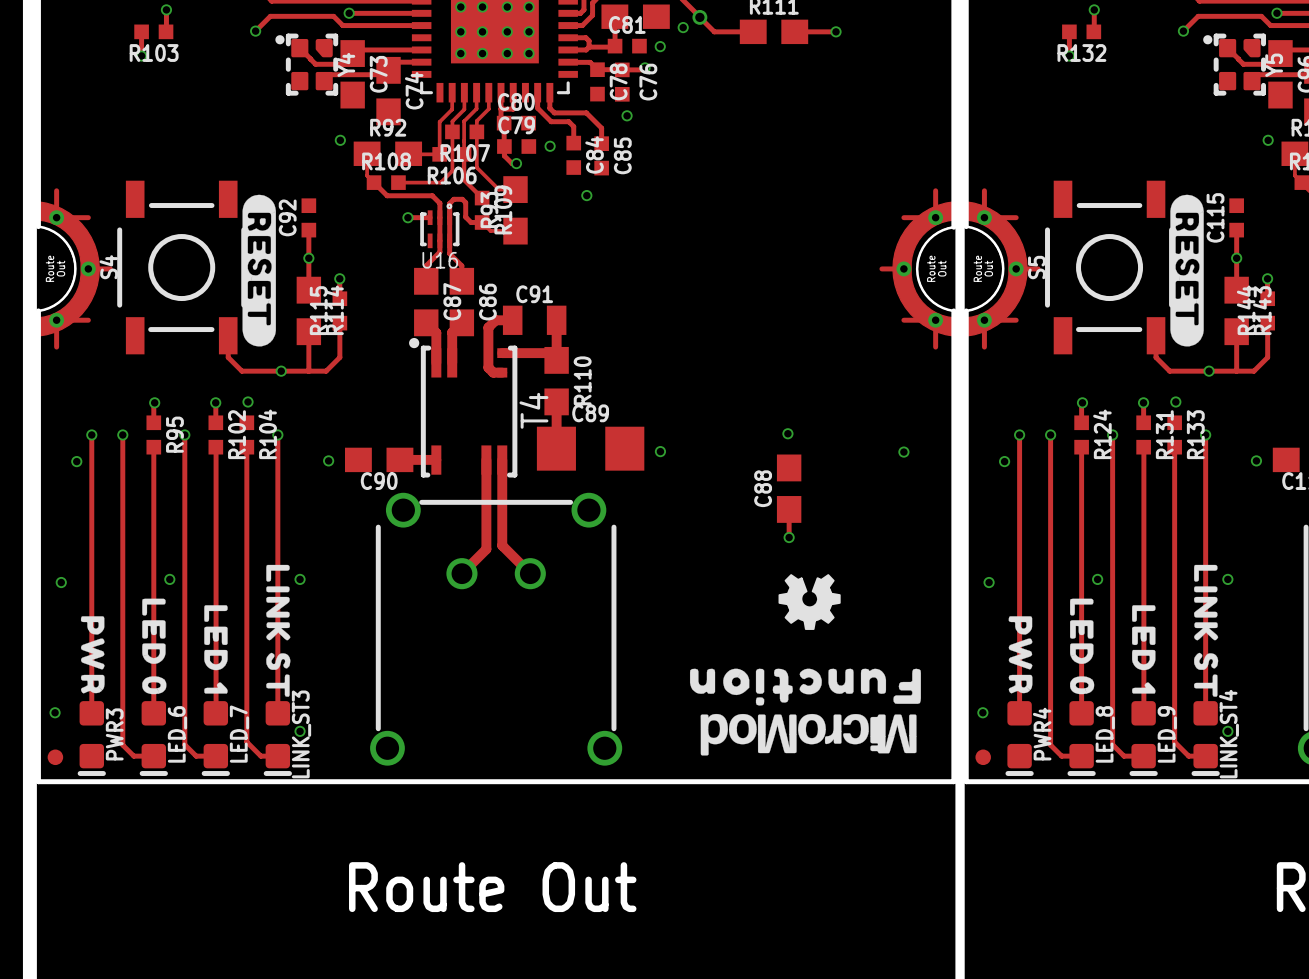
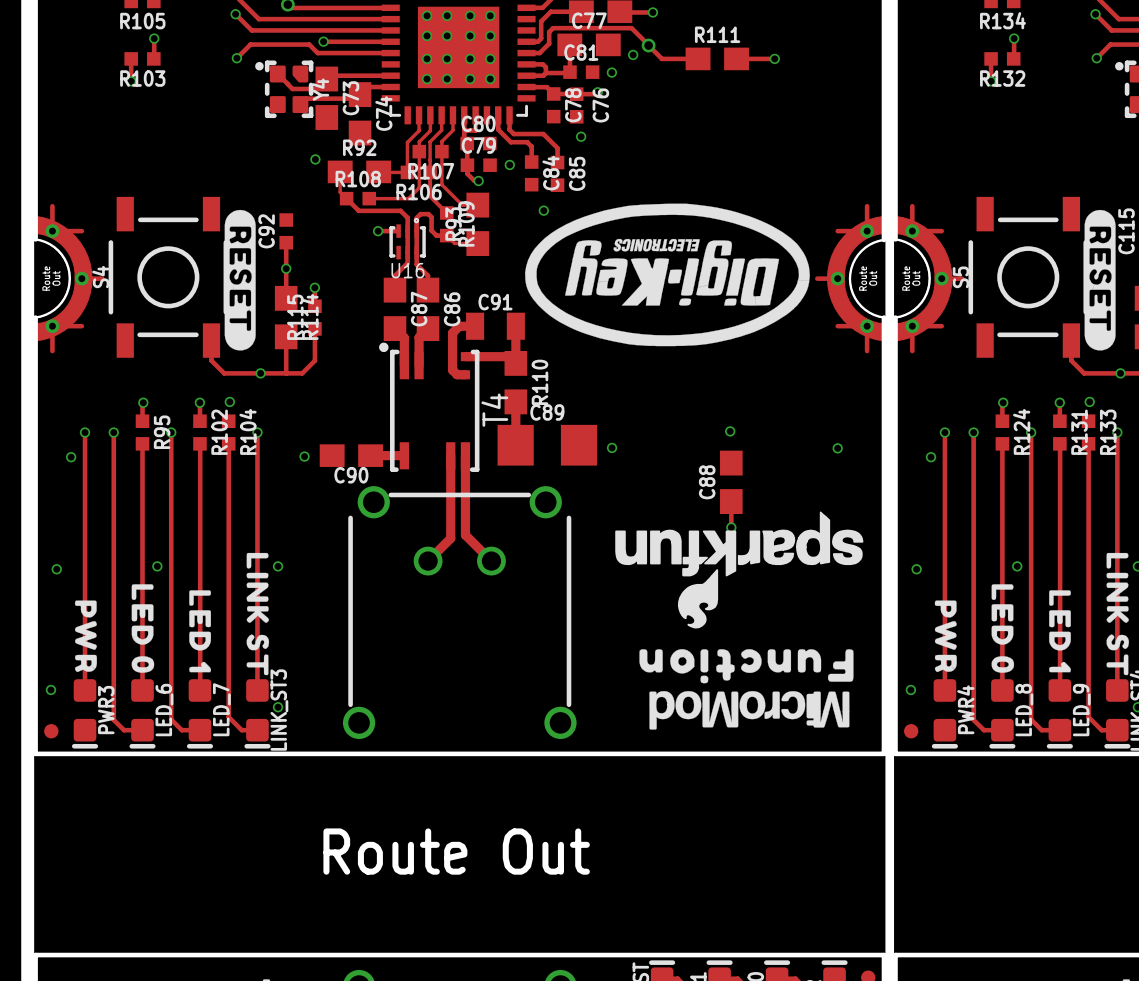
drawing: none -> [525, 203, 810, 347]
drawing shape: [778, 574, 841, 630] -> [615, 511, 864, 629]

